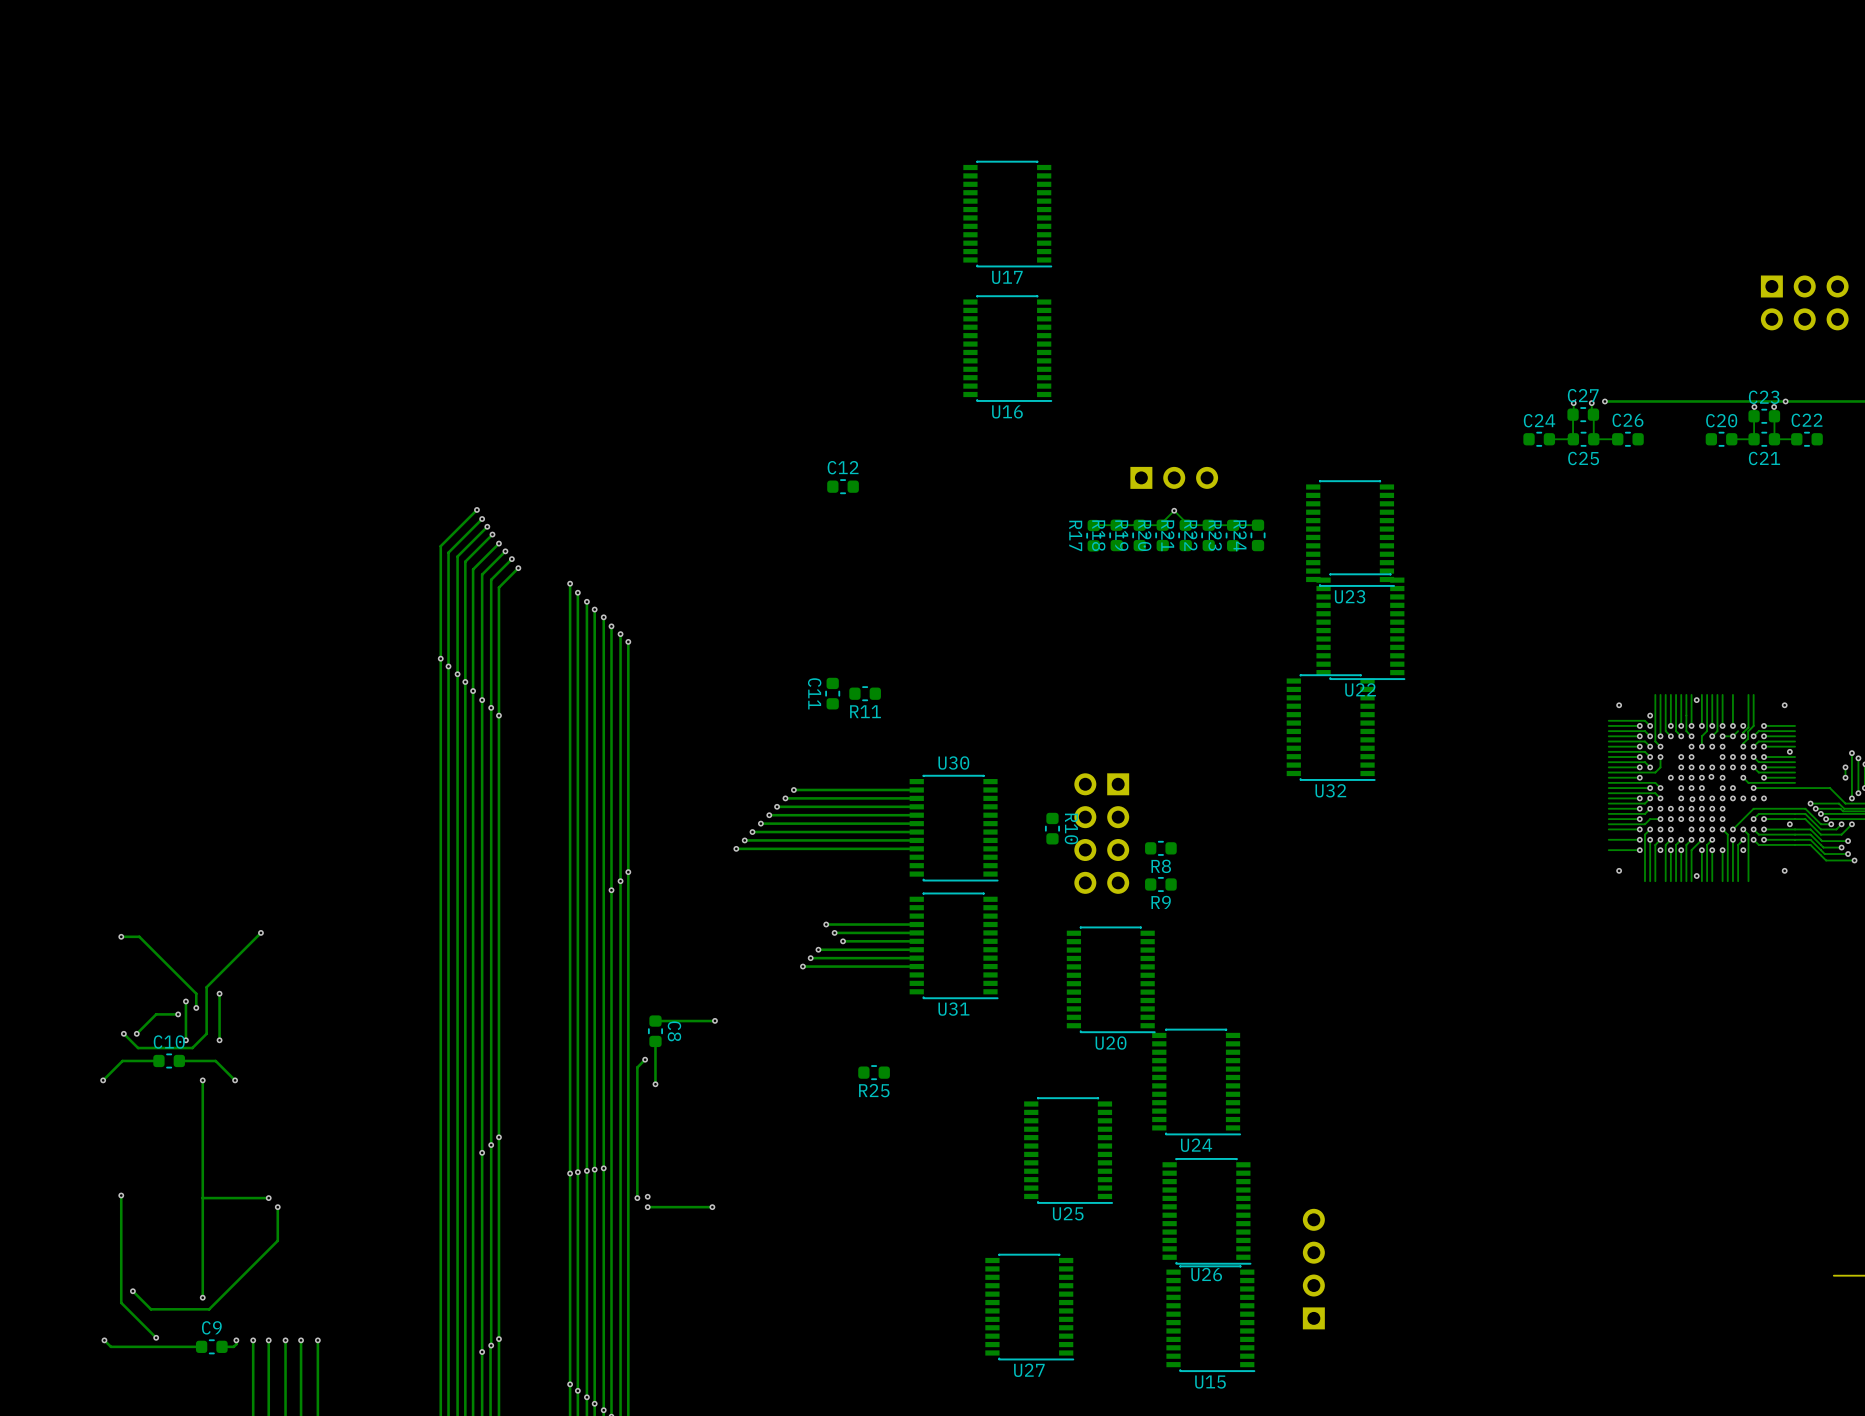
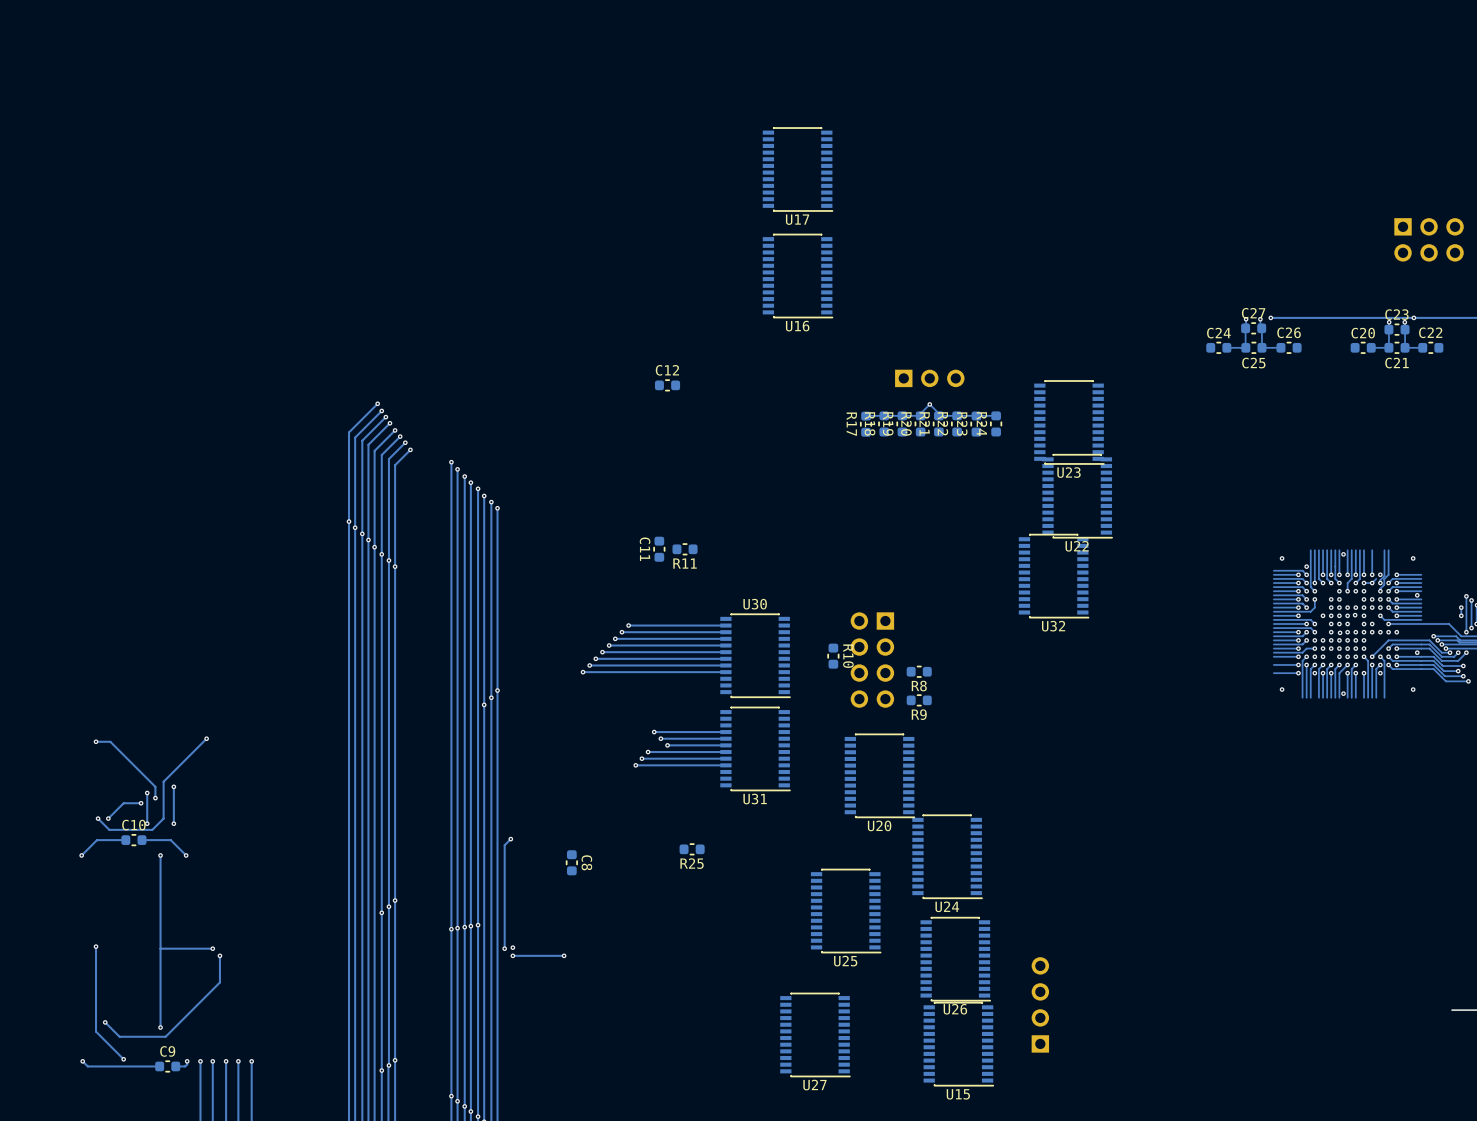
via: (714, 1020) -> none
track: (714, 1021) (655, 1021) -> none
C8 position: (655, 1031) -> (571, 862)
track: (655, 1041) (655, 1084) -> none
via: (655, 1084) -> none

